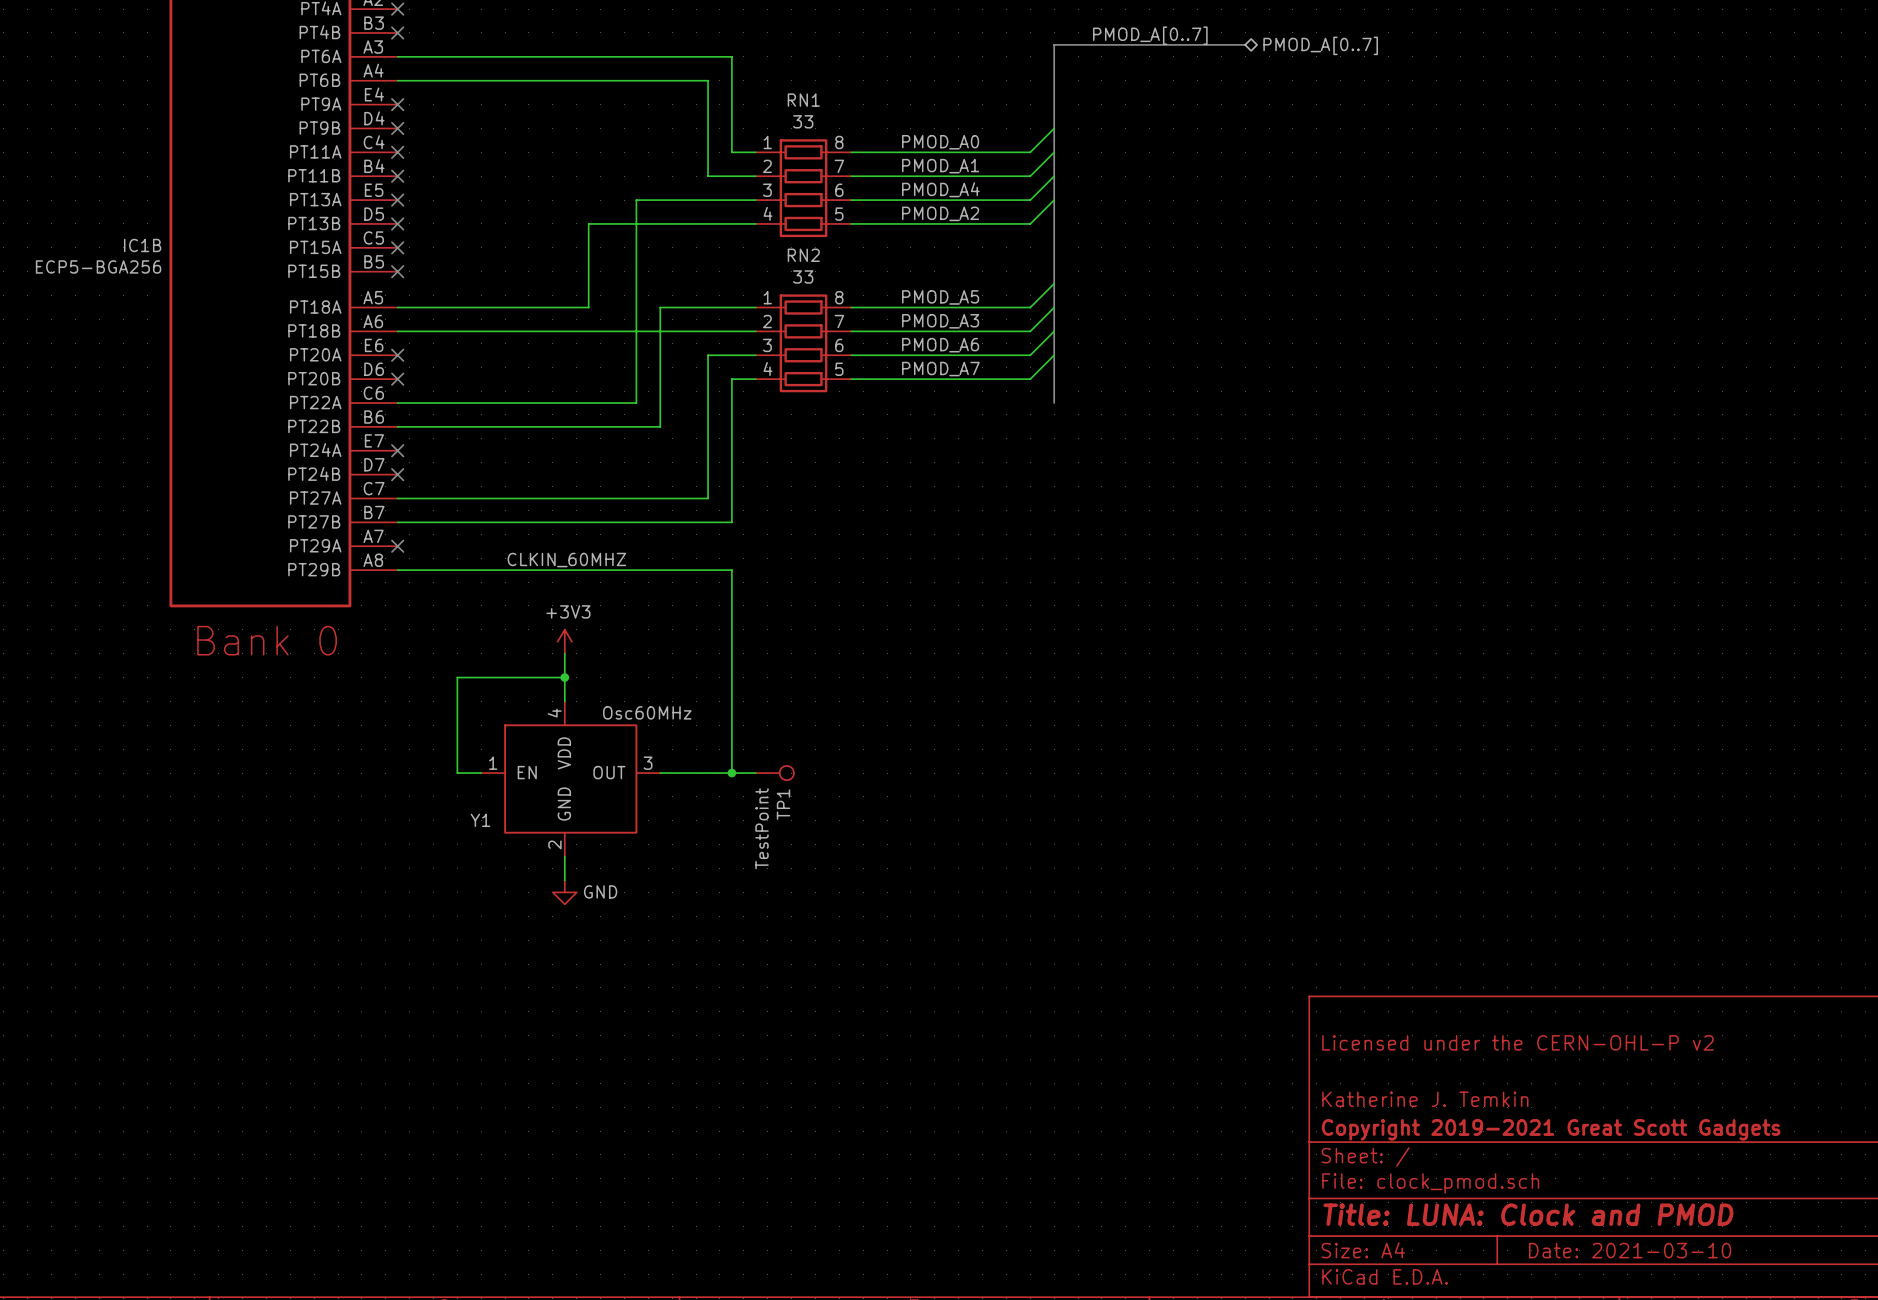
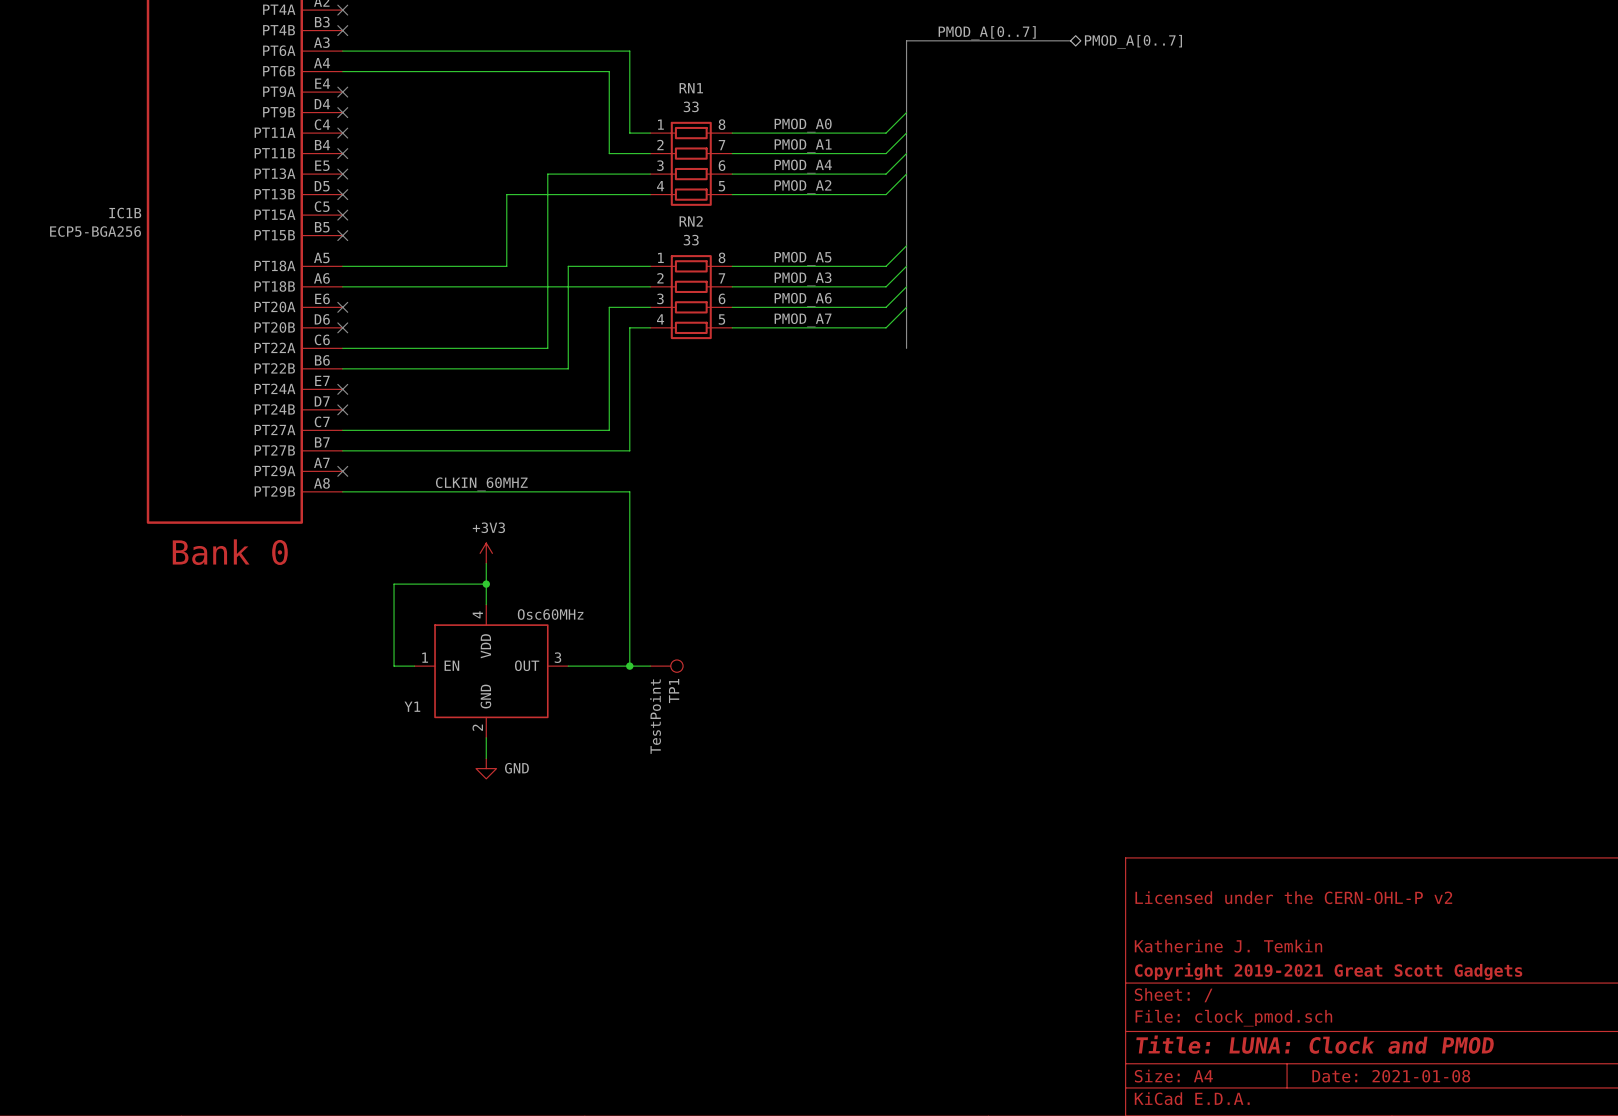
title block: Date: 2021-03-10 (1630, 1250) -> Date: 2021-01-08 (1391, 1076)

